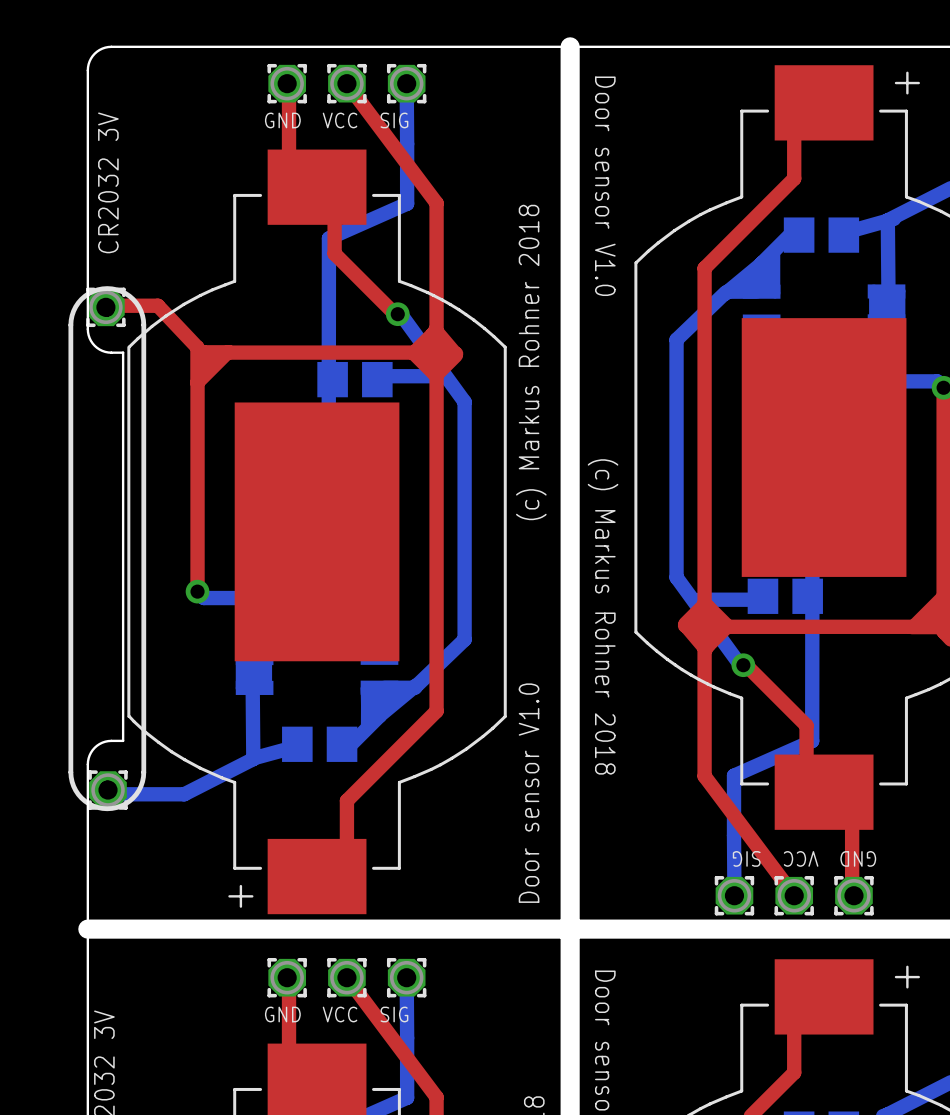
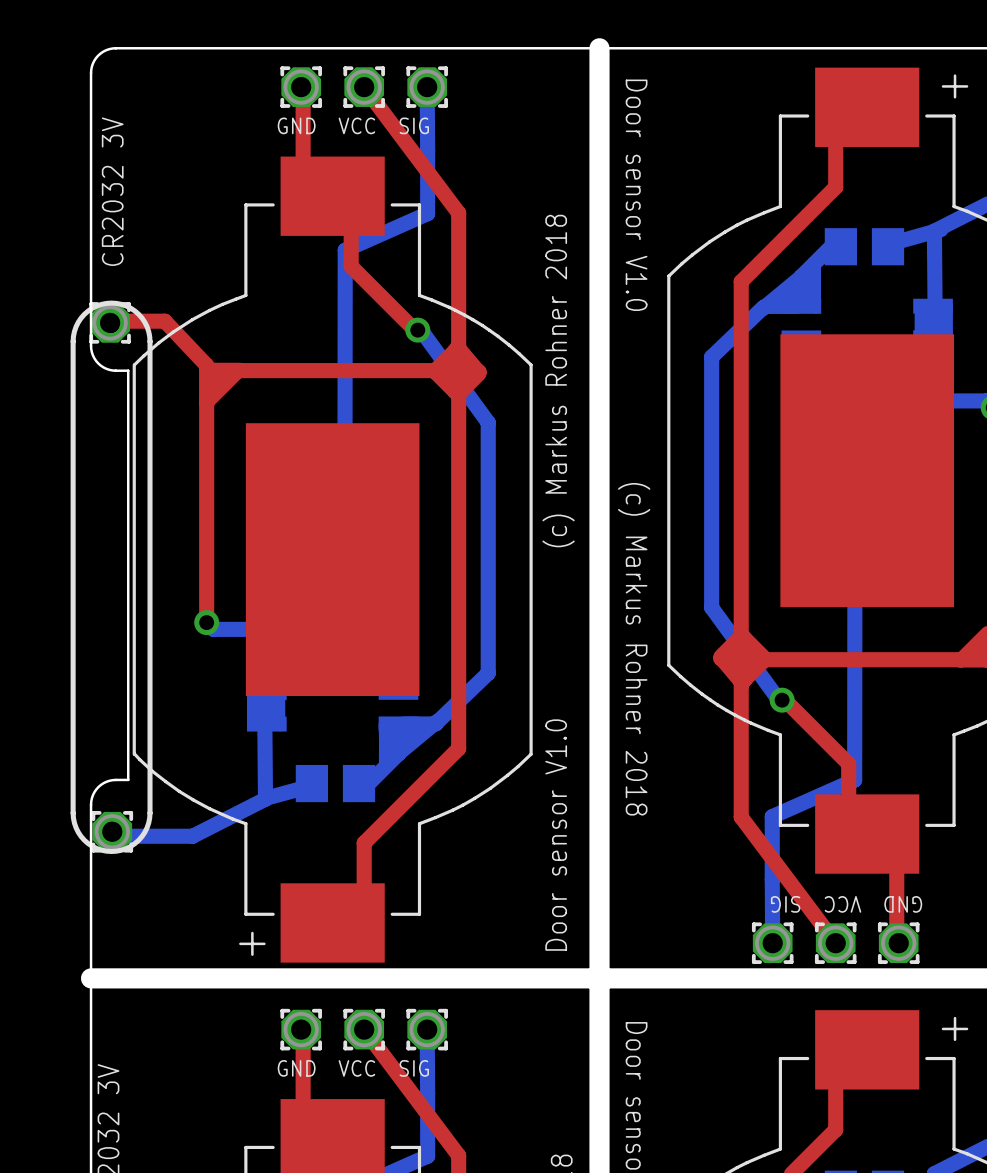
bottom track: (381, 376) (440, 376) -> none
part: (354, 379) -> none
part: (785, 596) -> none
bottom track: (699, 599) (758, 599) -> none

